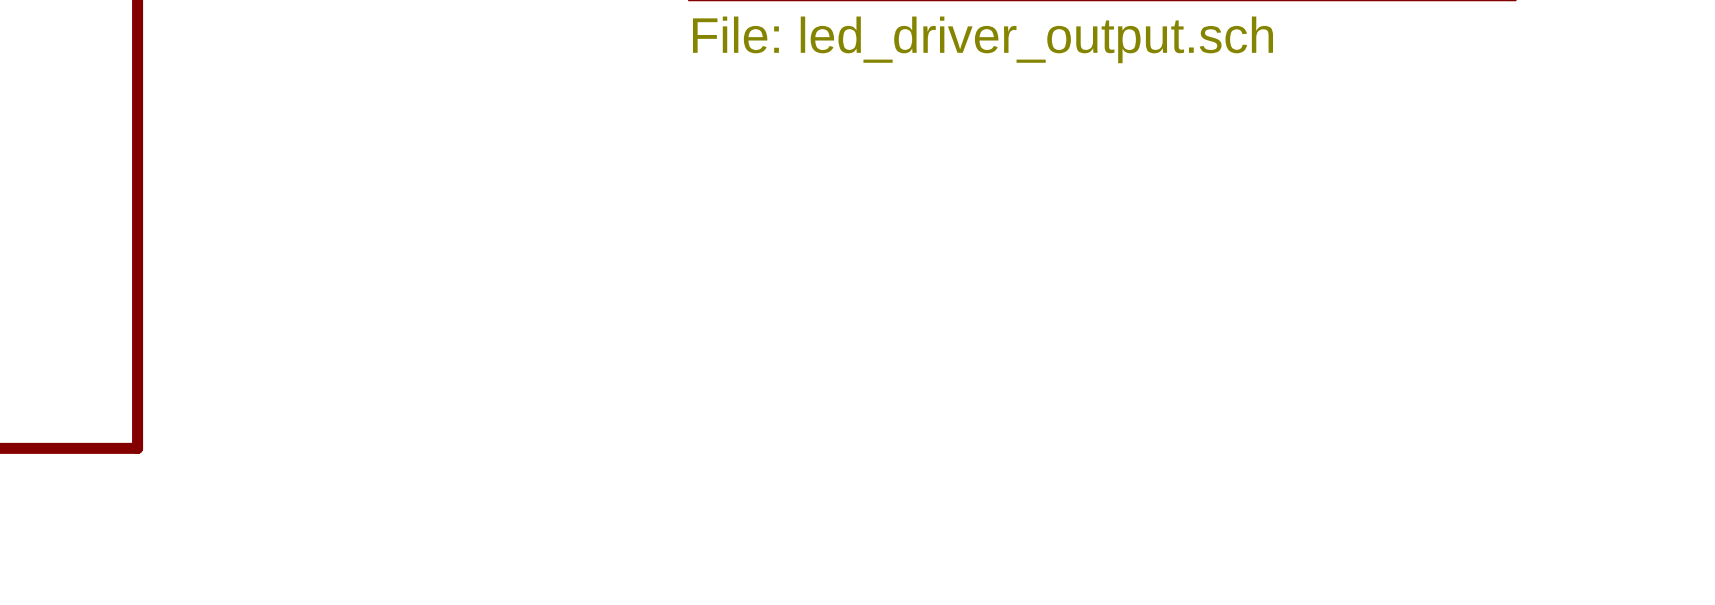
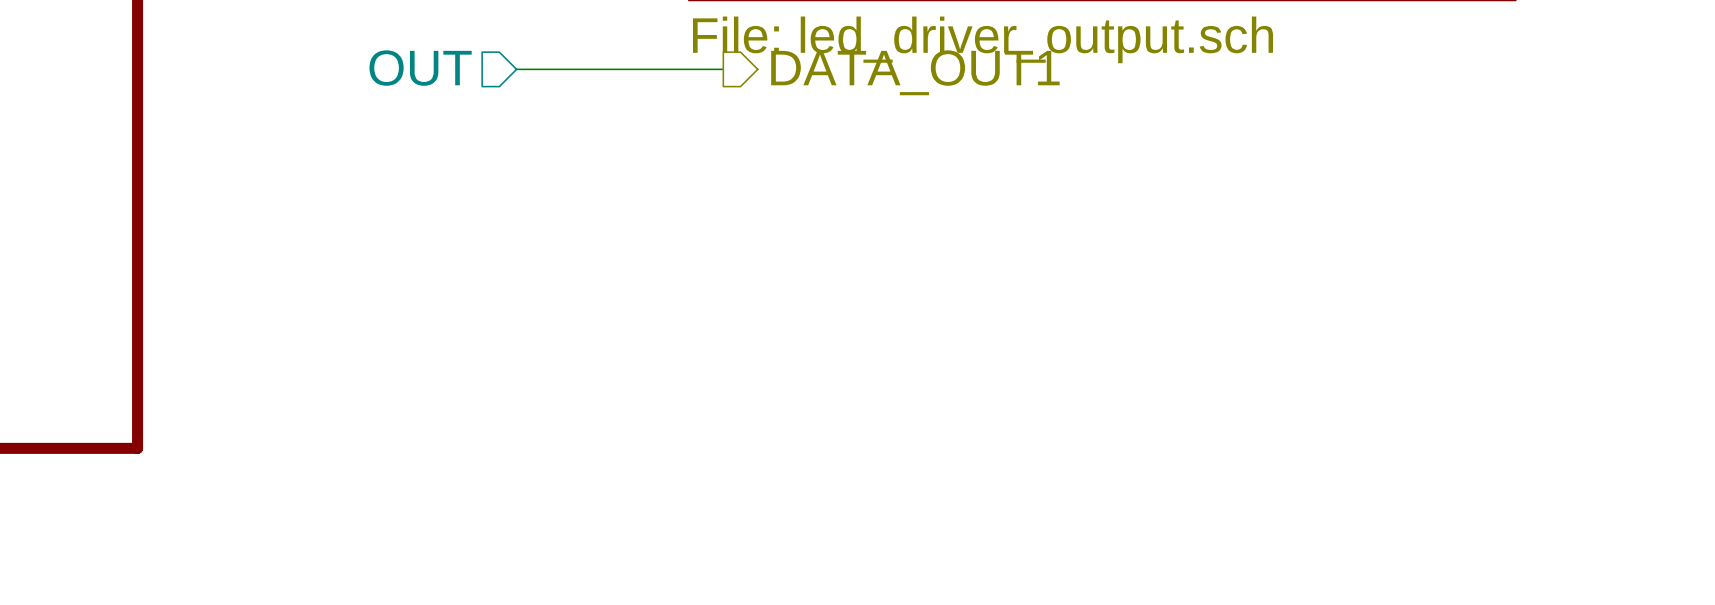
sheet pin: none -> OUT (420, 68)
wire: none -> (516, 69) (723, 69)
hierarchical label: none -> DATA_OUT1 (915, 72)

